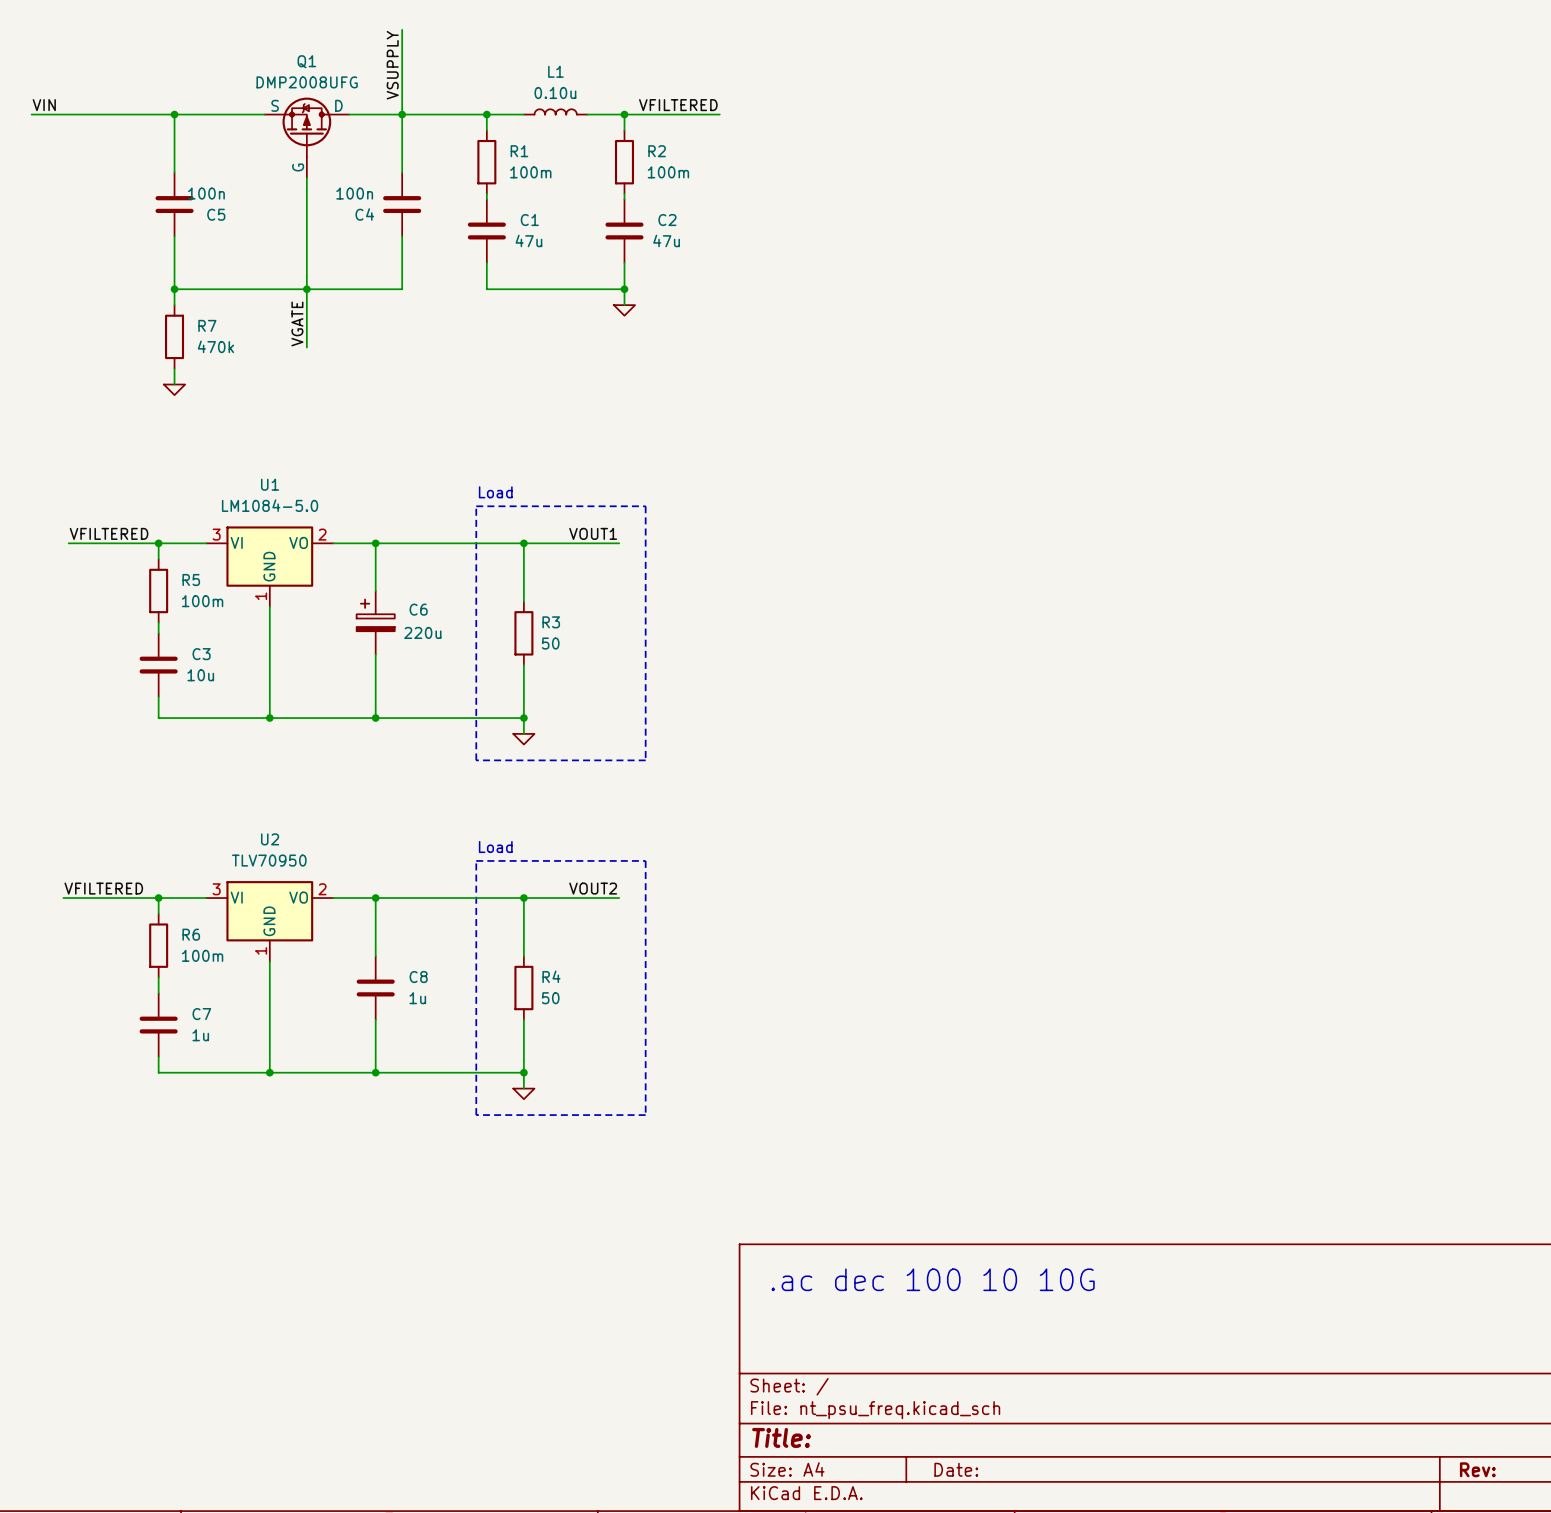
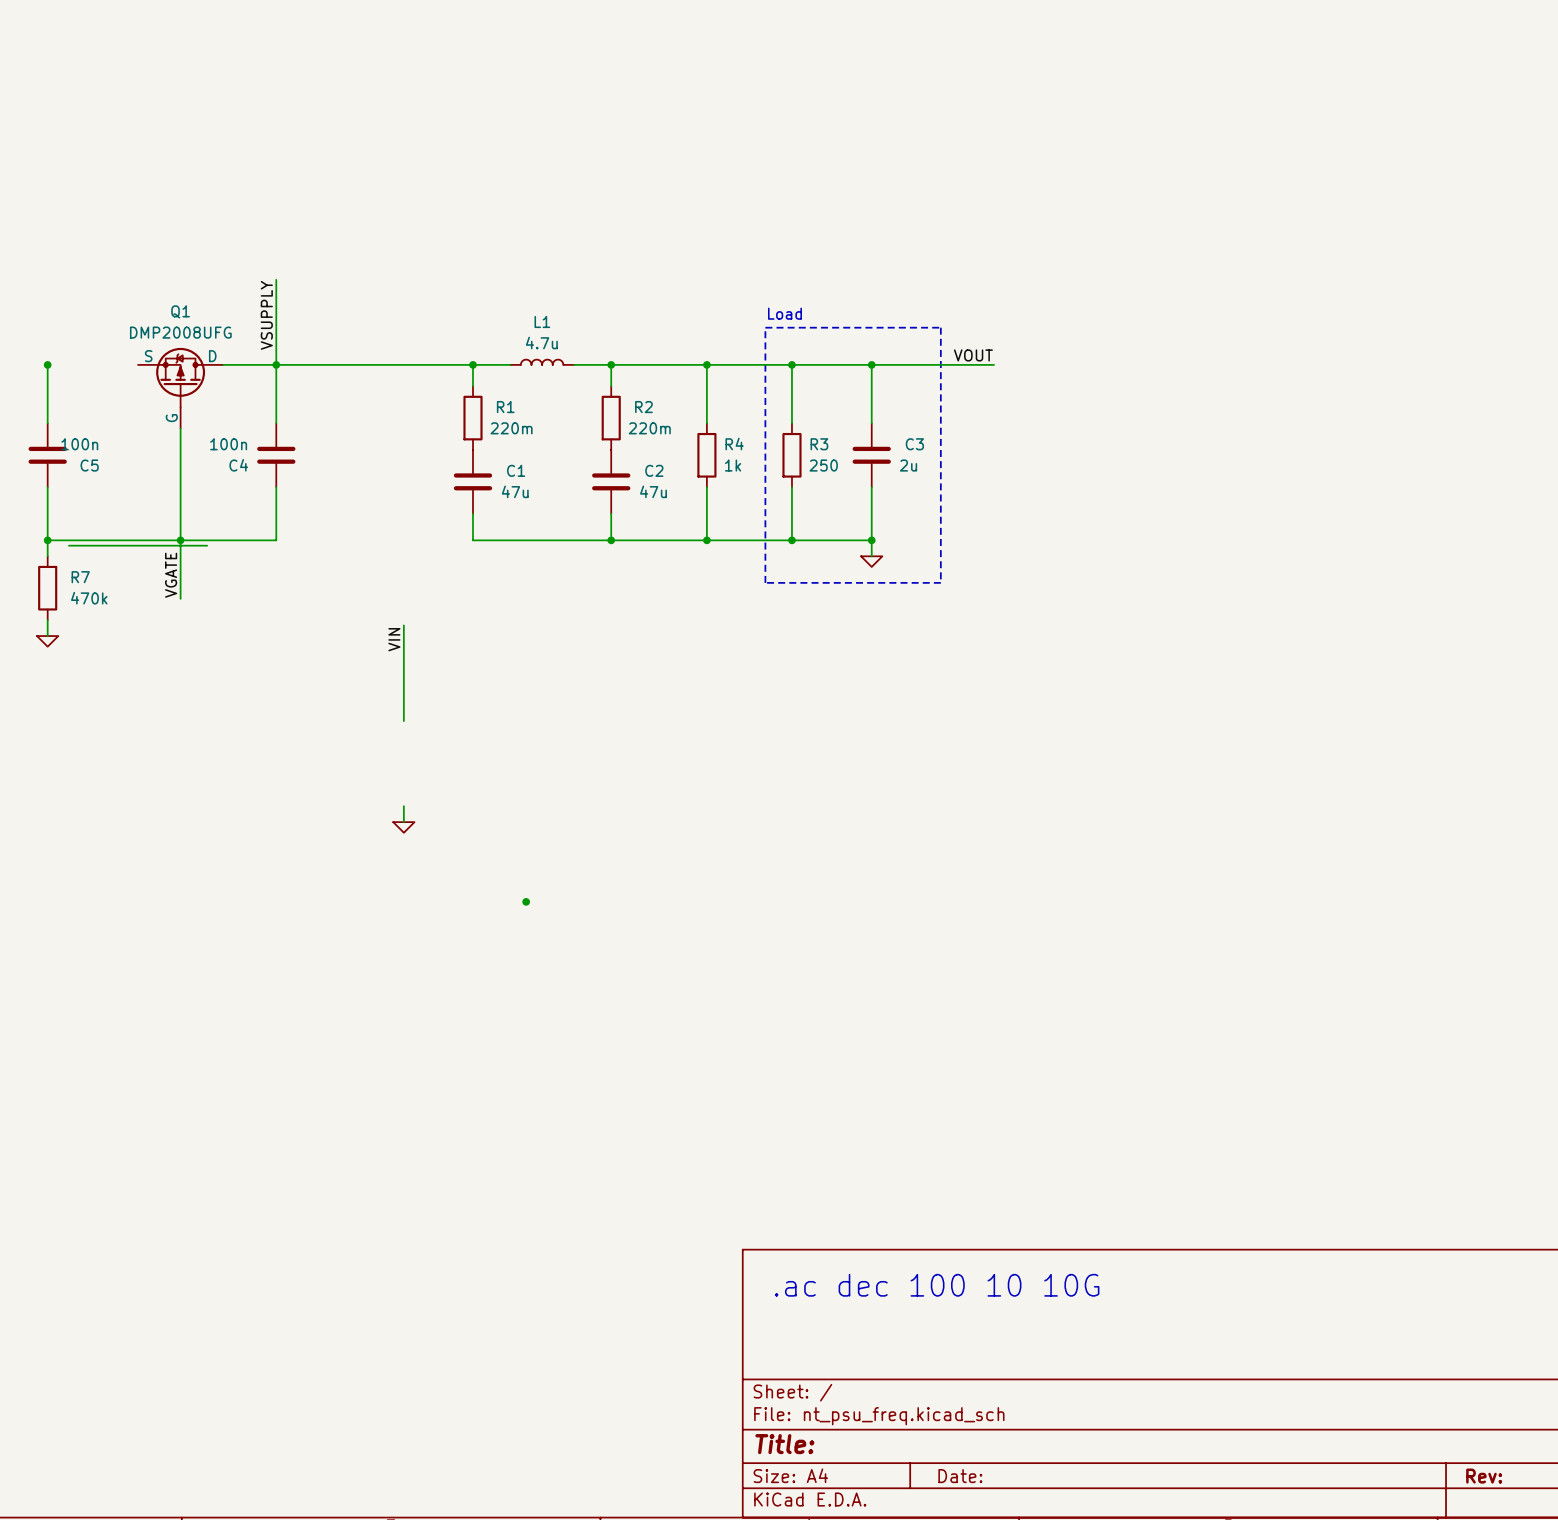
wire: (402, 29) (402, 172) -> none
label: VSUPPLY (392, 65) -> none
L1 text: 0.10u (555, 92) -> 4.7u (541, 343)
label: VIN (44, 105) -> none
label: VFILTERED (678, 105) -> none
L1 position: (555, 111) -> (542, 362)
wire: (31, 114) (264, 114) -> none
wire: (174, 114) (174, 172) -> none
junction: (174, 114) -> none
wire: (349, 114) (523, 114) -> none
junction: (402, 114) -> none
wire: (486, 114) (486, 130) -> none
junction: (486, 114) -> none
wire: (587, 114) (719, 114) -> none
wire: (624, 114) (624, 130) -> none
junction: (624, 114) -> none
Q1 position: (306, 137) -> (180, 388)
R1 position: (486, 162) -> (472, 418)
R2 position: (624, 162) -> (611, 418)
R1 value: 100m (530, 172) -> 220m (511, 428)
R2 value: 100m (668, 172) -> 220m (649, 428)
wire: (306, 178) (306, 347) -> none
wire: (486, 193) (486, 199) -> none
wire: (624, 193) (624, 199) -> none
C5 position: (174, 204) -> (47, 455)
C4 position: (402, 204) -> (276, 455)
C1 position: (486, 231) -> (472, 481)
C2 position: (624, 231) -> (611, 481)
wire: (174, 236) (174, 305) -> none
wire: (402, 236) (402, 289) (174, 289) -> none
wire: (486, 262) (486, 289) (624, 289) -> none
wire: (624, 262) (624, 305) -> none
wire: none -> (276, 279) (276, 423)
junction: (174, 289) -> none
junction: (306, 289) -> none
junction: (624, 289) -> none
power symbol: (624, 310) -> none
text: none -> Load (784, 313)
label: none -> VSUPPLY (266, 315)
label: VGATE (297, 323) -> none
line: none -> (765, 327) (940, 327) (940, 582) (765, 582) (765, 327)
R7 position: (174, 336) -> (47, 588)
label: none -> VOUT (973, 355)
wire: none -> (47, 364) (47, 423)
junction: none -> (47, 364)
wire: none -> (223, 364) (510, 364)
junction: none -> (276, 364)
wire: none -> (472, 364) (472, 386)
junction: none -> (472, 364)
wire: none -> (574, 364) (994, 364)
wire: none -> (611, 364) (611, 386)
junction: none -> (611, 364)
wire: none -> (706, 364) (706, 423)
junction: none -> (706, 364)
wire: none -> (791, 364) (791, 423)
junction: none -> (791, 364)
wire: none -> (871, 364) (871, 423)
junction: none -> (871, 364)
wire: (174, 368) (174, 384) -> none
power symbol: (174, 389) -> none
wire: none -> (180, 428) (180, 598)
C3 value: none -> 2u (908, 465)
wire: none -> (47, 487) (47, 556)
wire: none -> (276, 487) (276, 540) (47, 540)
wire: none -> (706, 487) (706, 540)
wire: none -> (791, 487) (791, 540)
wire: none -> (871, 487) (871, 556)
text: Load (495, 492) -> none
line: (476, 506) (645, 506) (645, 760) (476, 760) (476, 506) -> none
wire: none -> (472, 513) (472, 540) (871, 540)
wire: none -> (611, 513) (611, 540)
label: VFILTERED (109, 533) -> none
label: VOUT1 (593, 533) -> none
junction: none -> (47, 540)
junction: none -> (611, 540)
junction: none -> (706, 540)
junction: none -> (791, 540)
junction: none -> (871, 540)
wire: (158, 543) (158, 559) -> (47, 620) (47, 636)
junction position: (158, 543) -> (180, 540)
wire: (333, 543) (619, 543) -> none
wire: (375, 543) (375, 590) -> none
junction: (375, 543) -> none
wire: (523, 543) (523, 601) -> none
junction: (523, 543) -> none
power symbol: none -> (871, 561)
U1: LM1084-5.0 (269, 566) -> none
label: none -> VGATE (171, 575)
R5: 100m (158, 590) -> none
wire: (269, 606) (269, 718) -> none
wire: (158, 622) (158, 633) -> none
C6: (375, 622) -> none
wire: none -> (403, 625) (403, 721)
R3 position: (523, 633) -> (791, 455)
label: none -> VIN (394, 639)
power symbol: none -> (47, 641)
R3 value: 50 (550, 643) -> 250 (823, 465)
wire: (375, 654) (375, 718) -> none
C3 position: (158, 665) -> (871, 455)
wire: (523, 665) (523, 733) -> none
C3 text: 10u (200, 675) -> none
wire: (158, 696) (158, 718) (523, 718) -> none
junction: (269, 718) -> none
junction: (375, 718) -> none
junction: (523, 718) -> none
power symbol: (523, 739) -> none
wire: none -> (403, 806) (403, 822)
power symbol: none -> (403, 827)
text: Load (495, 846) -> none
line: (476, 860) (476, 1115) (645, 1115) (645, 860) (476, 860) -> none
label: VFILTERED (103, 888) -> none
label: VOUT2 (593, 888) -> none
wire: (63, 898) (206, 898) -> none
wire: (158, 898) (158, 913) -> none
junction: (158, 898) -> none
wire: (333, 898) (619, 898) -> none
wire: (375, 898) (375, 956) -> none
junction: (375, 898) -> none
wire: (523, 898) (523, 956) -> none
U2: TLV70950 (269, 921) -> none
R6: 100m (158, 945) -> none
wire: (269, 961) (269, 1072) -> none
wire: (158, 977) (158, 993) -> none
C8: (375, 988) -> none
R4 position: (523, 988) -> (706, 455)
R4 value: 50 (550, 998) -> 1k (733, 465)
wire: (375, 1019) (375, 1072) -> none
wire: (523, 1019) (523, 1088) -> none
C7: (158, 1025) -> none
wire: (158, 1056) (158, 1072) (523, 1072) -> none
junction: (269, 1072) -> none
junction: (375, 1072) -> none
junction: (523, 1072) -> none
power symbol: (523, 1093) -> none

